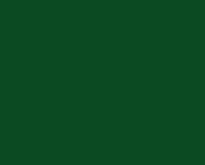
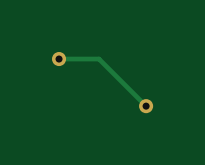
track: none -> (59, 59) (98, 59) (146, 106)
via: none -> (59, 59)
via: none -> (146, 106)

